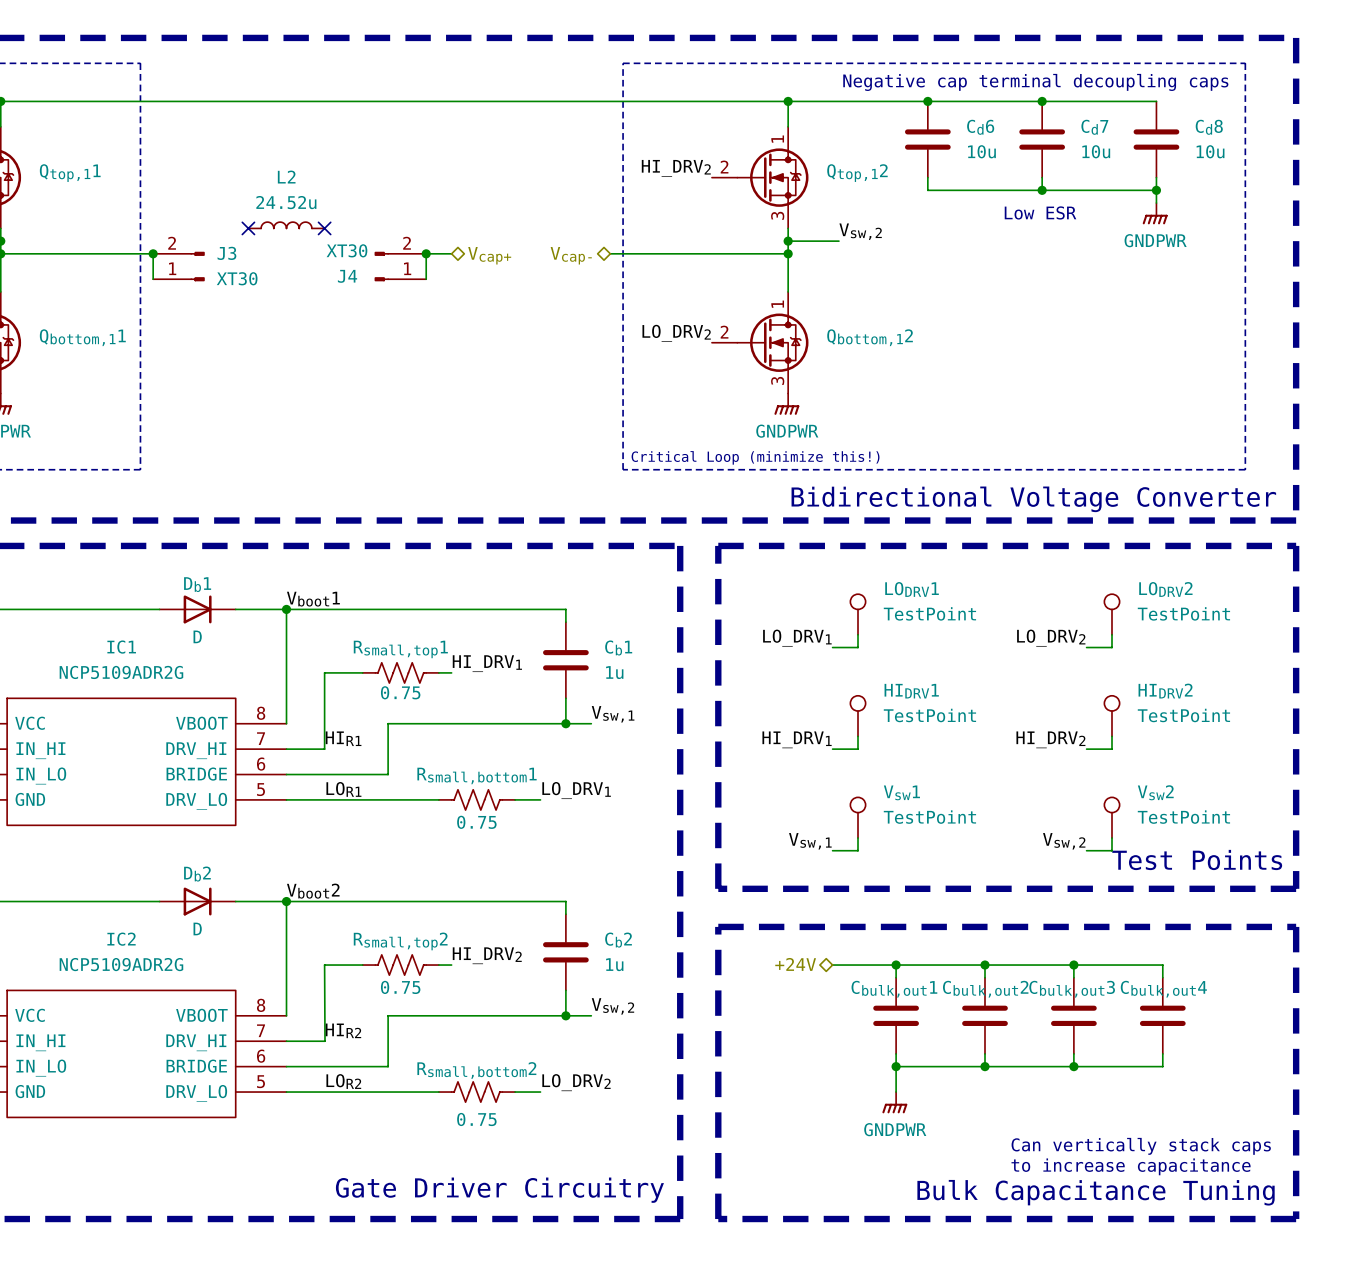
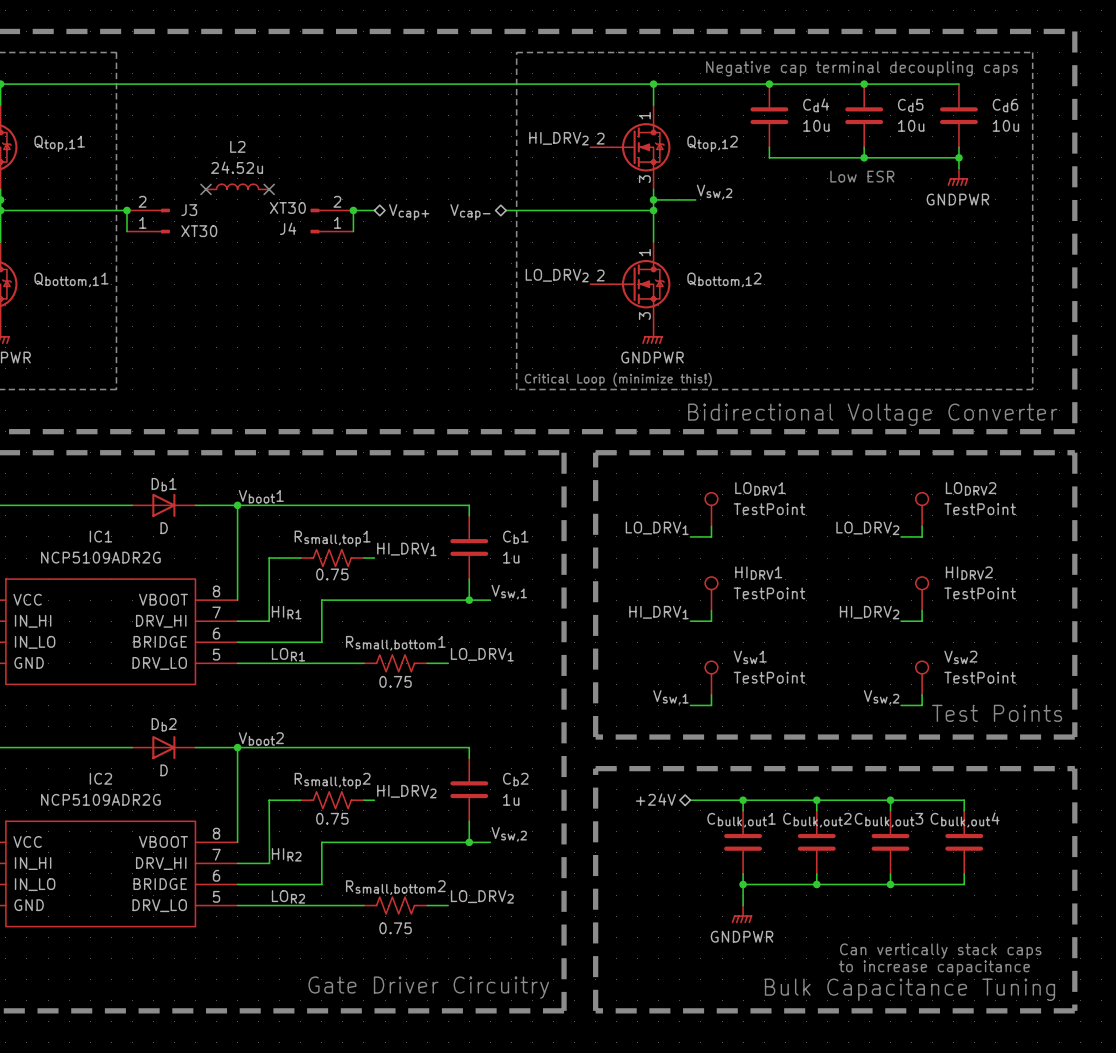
Cd6 name: Cd6 (980, 127) -> Cd4 (816, 105)
Cd7 name: Cd7 (1094, 127) -> Cd5 (910, 105)
Cd8 name: Cd8 (1209, 127) -> Cd6 (1005, 105)

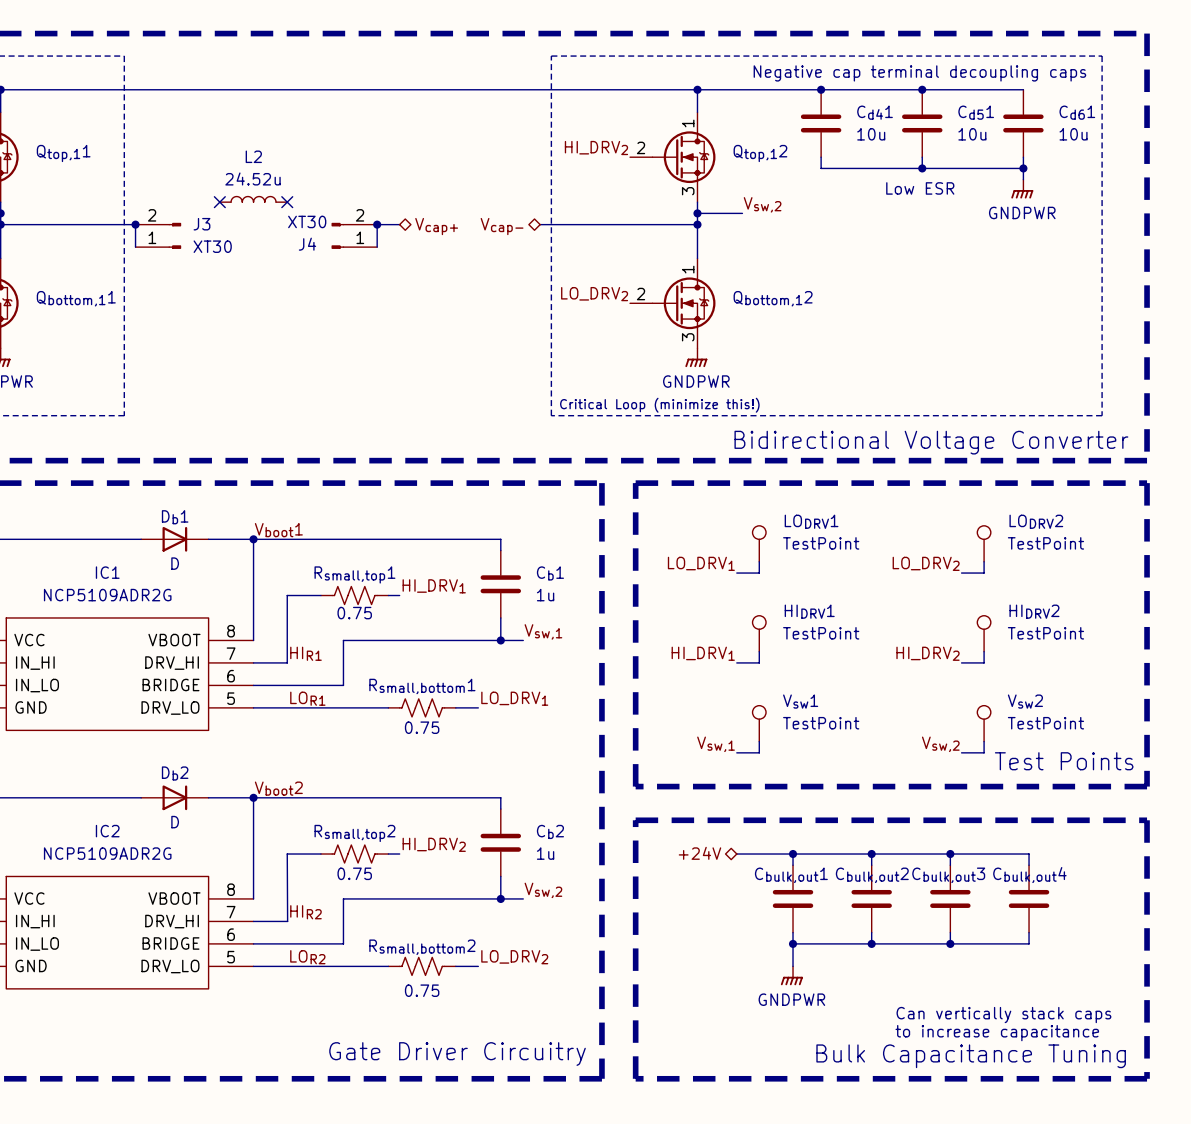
Cd4 name: Cd4 (816, 105) -> Cd41 (875, 112)
Cd5 name: Cd5 (910, 105) -> Cd51 (976, 112)
Cd6 name: Cd6 (1005, 105) -> Cd61 (1077, 112)

